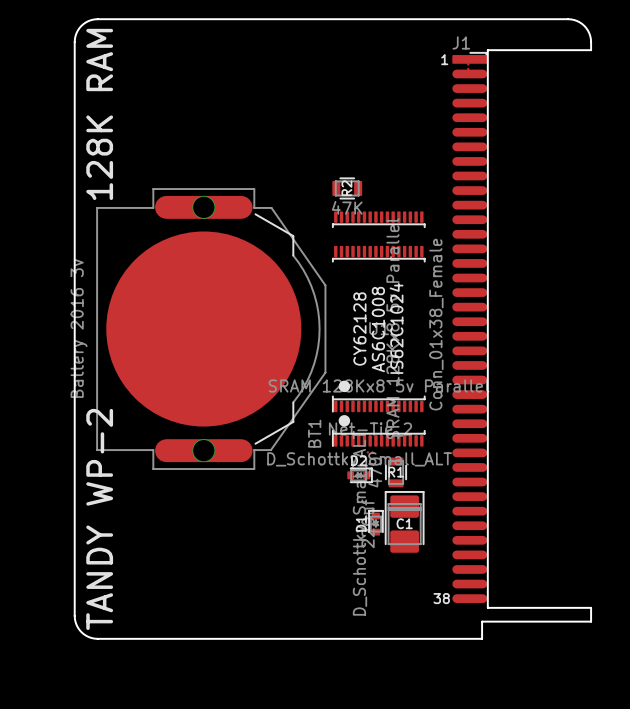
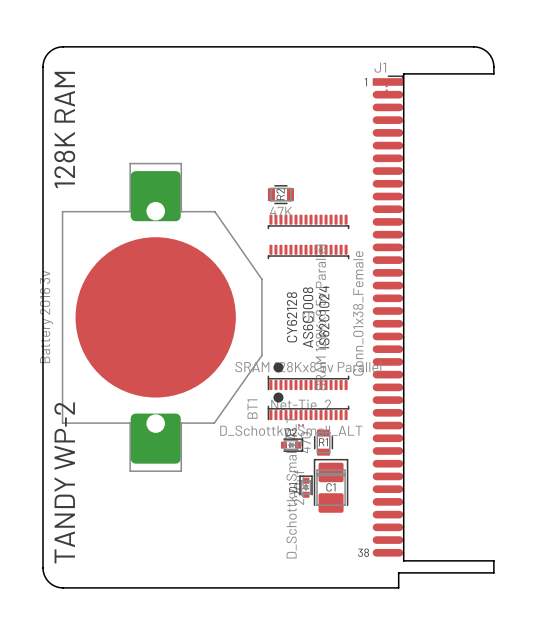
BT1 footprint: [96, 188, 327, 470] -> [62, 163, 263, 472]

